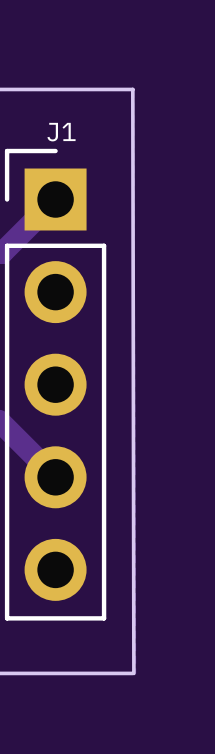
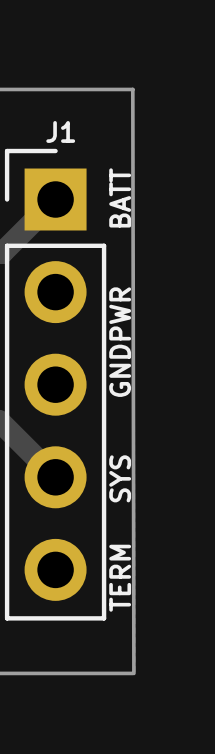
J1 text: none -> BATT (120, 197)
J1 text: none -> GNDPWR (120, 342)
J1 text: none -> SYS (120, 478)
J1 text: none -> TERM (120, 578)

